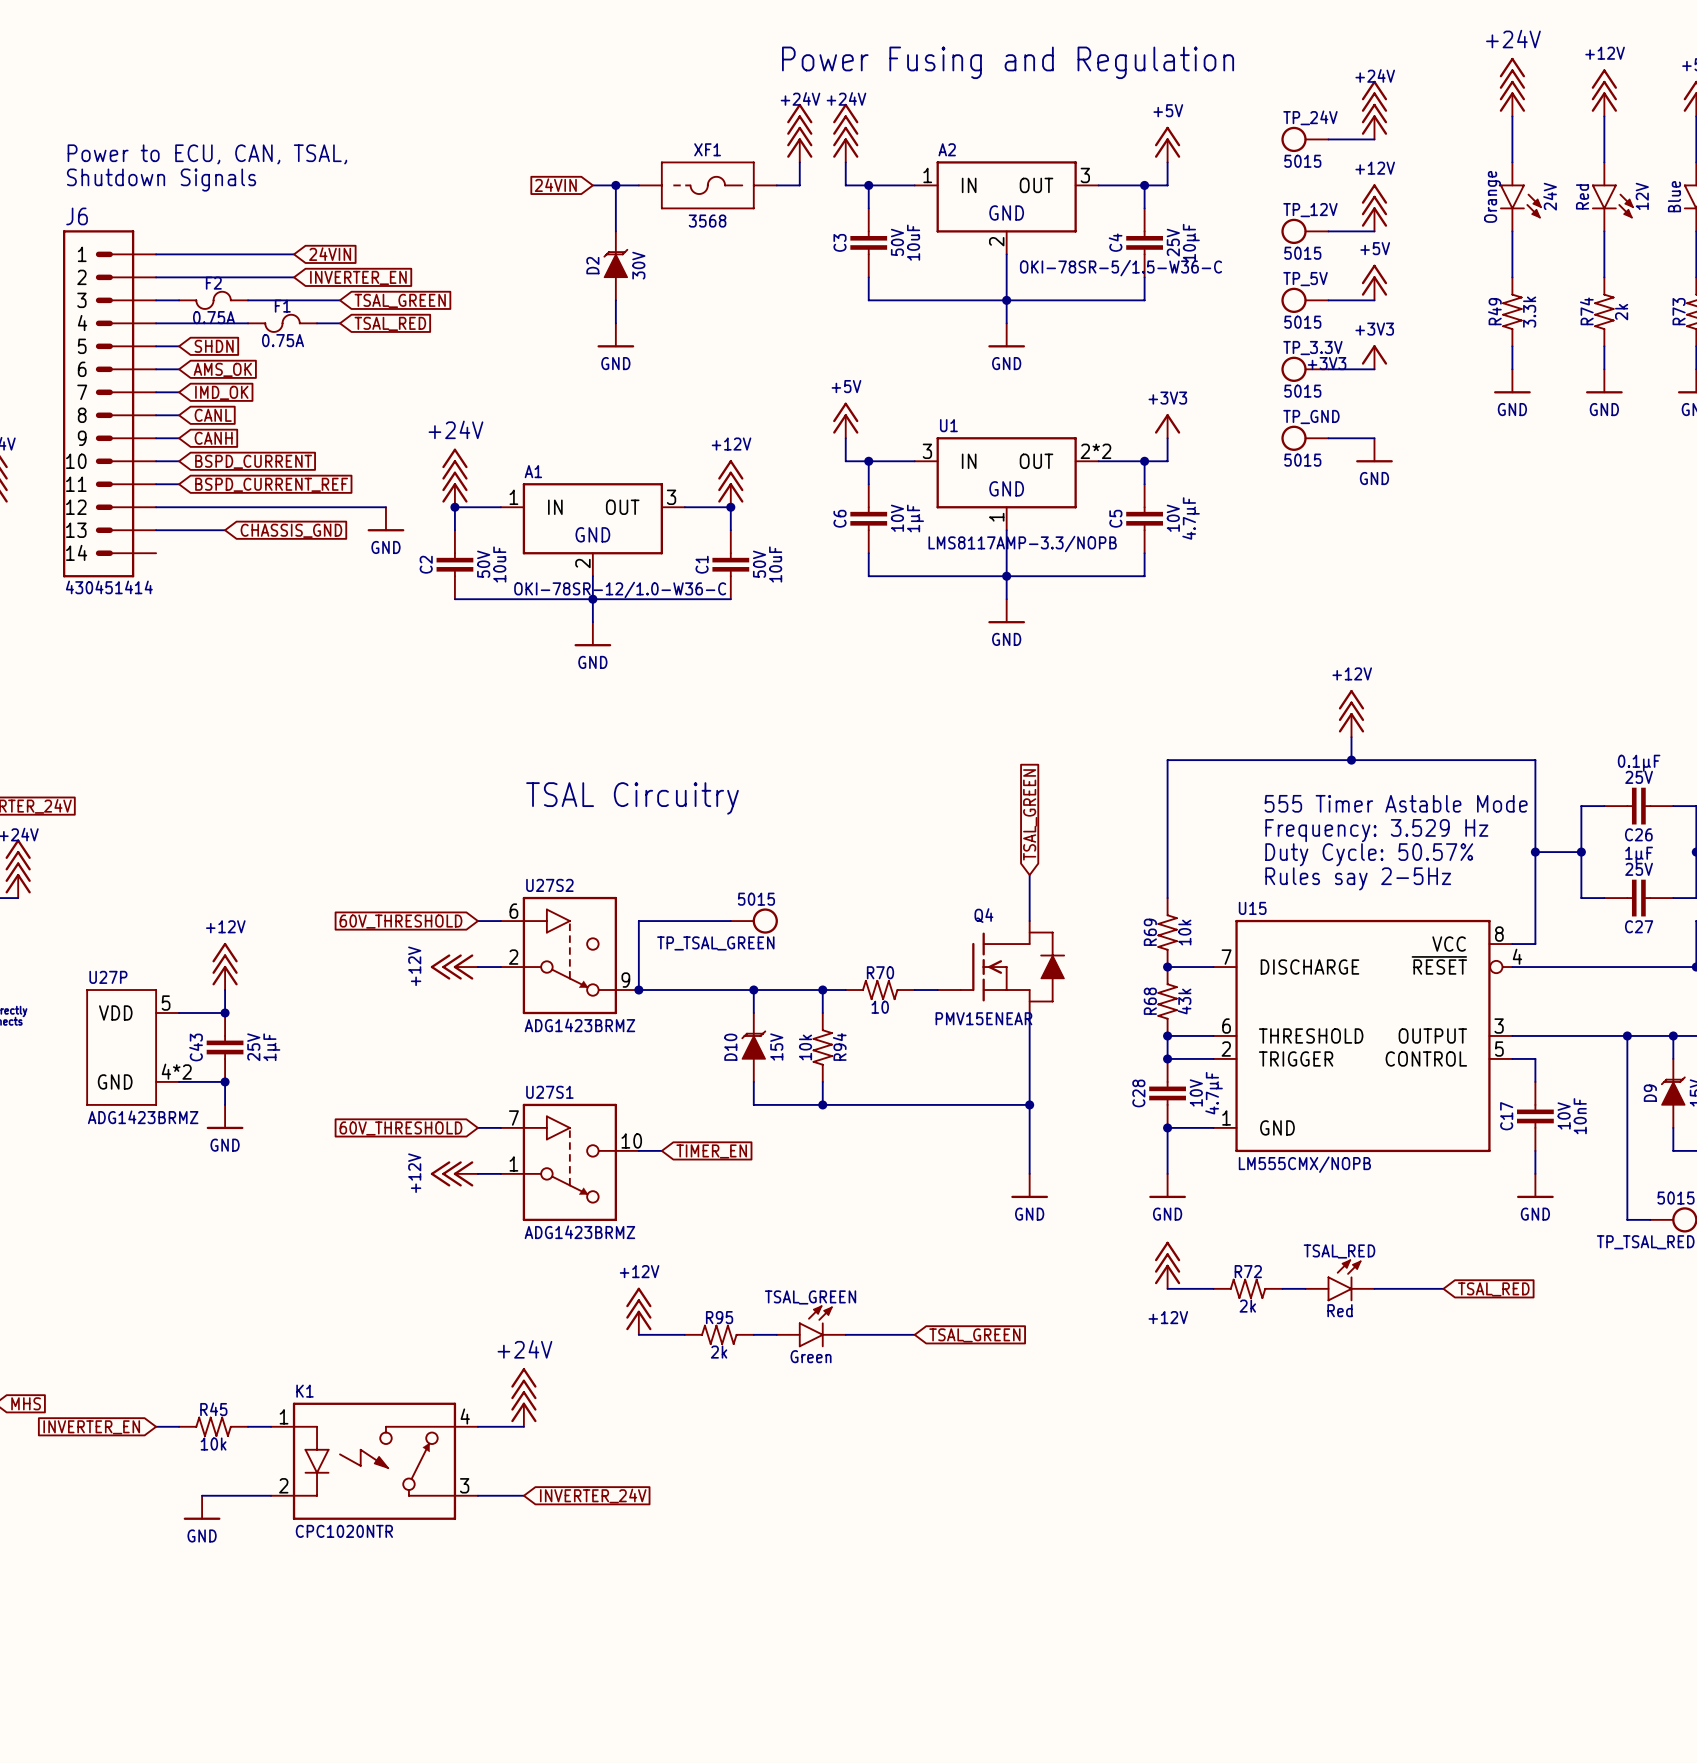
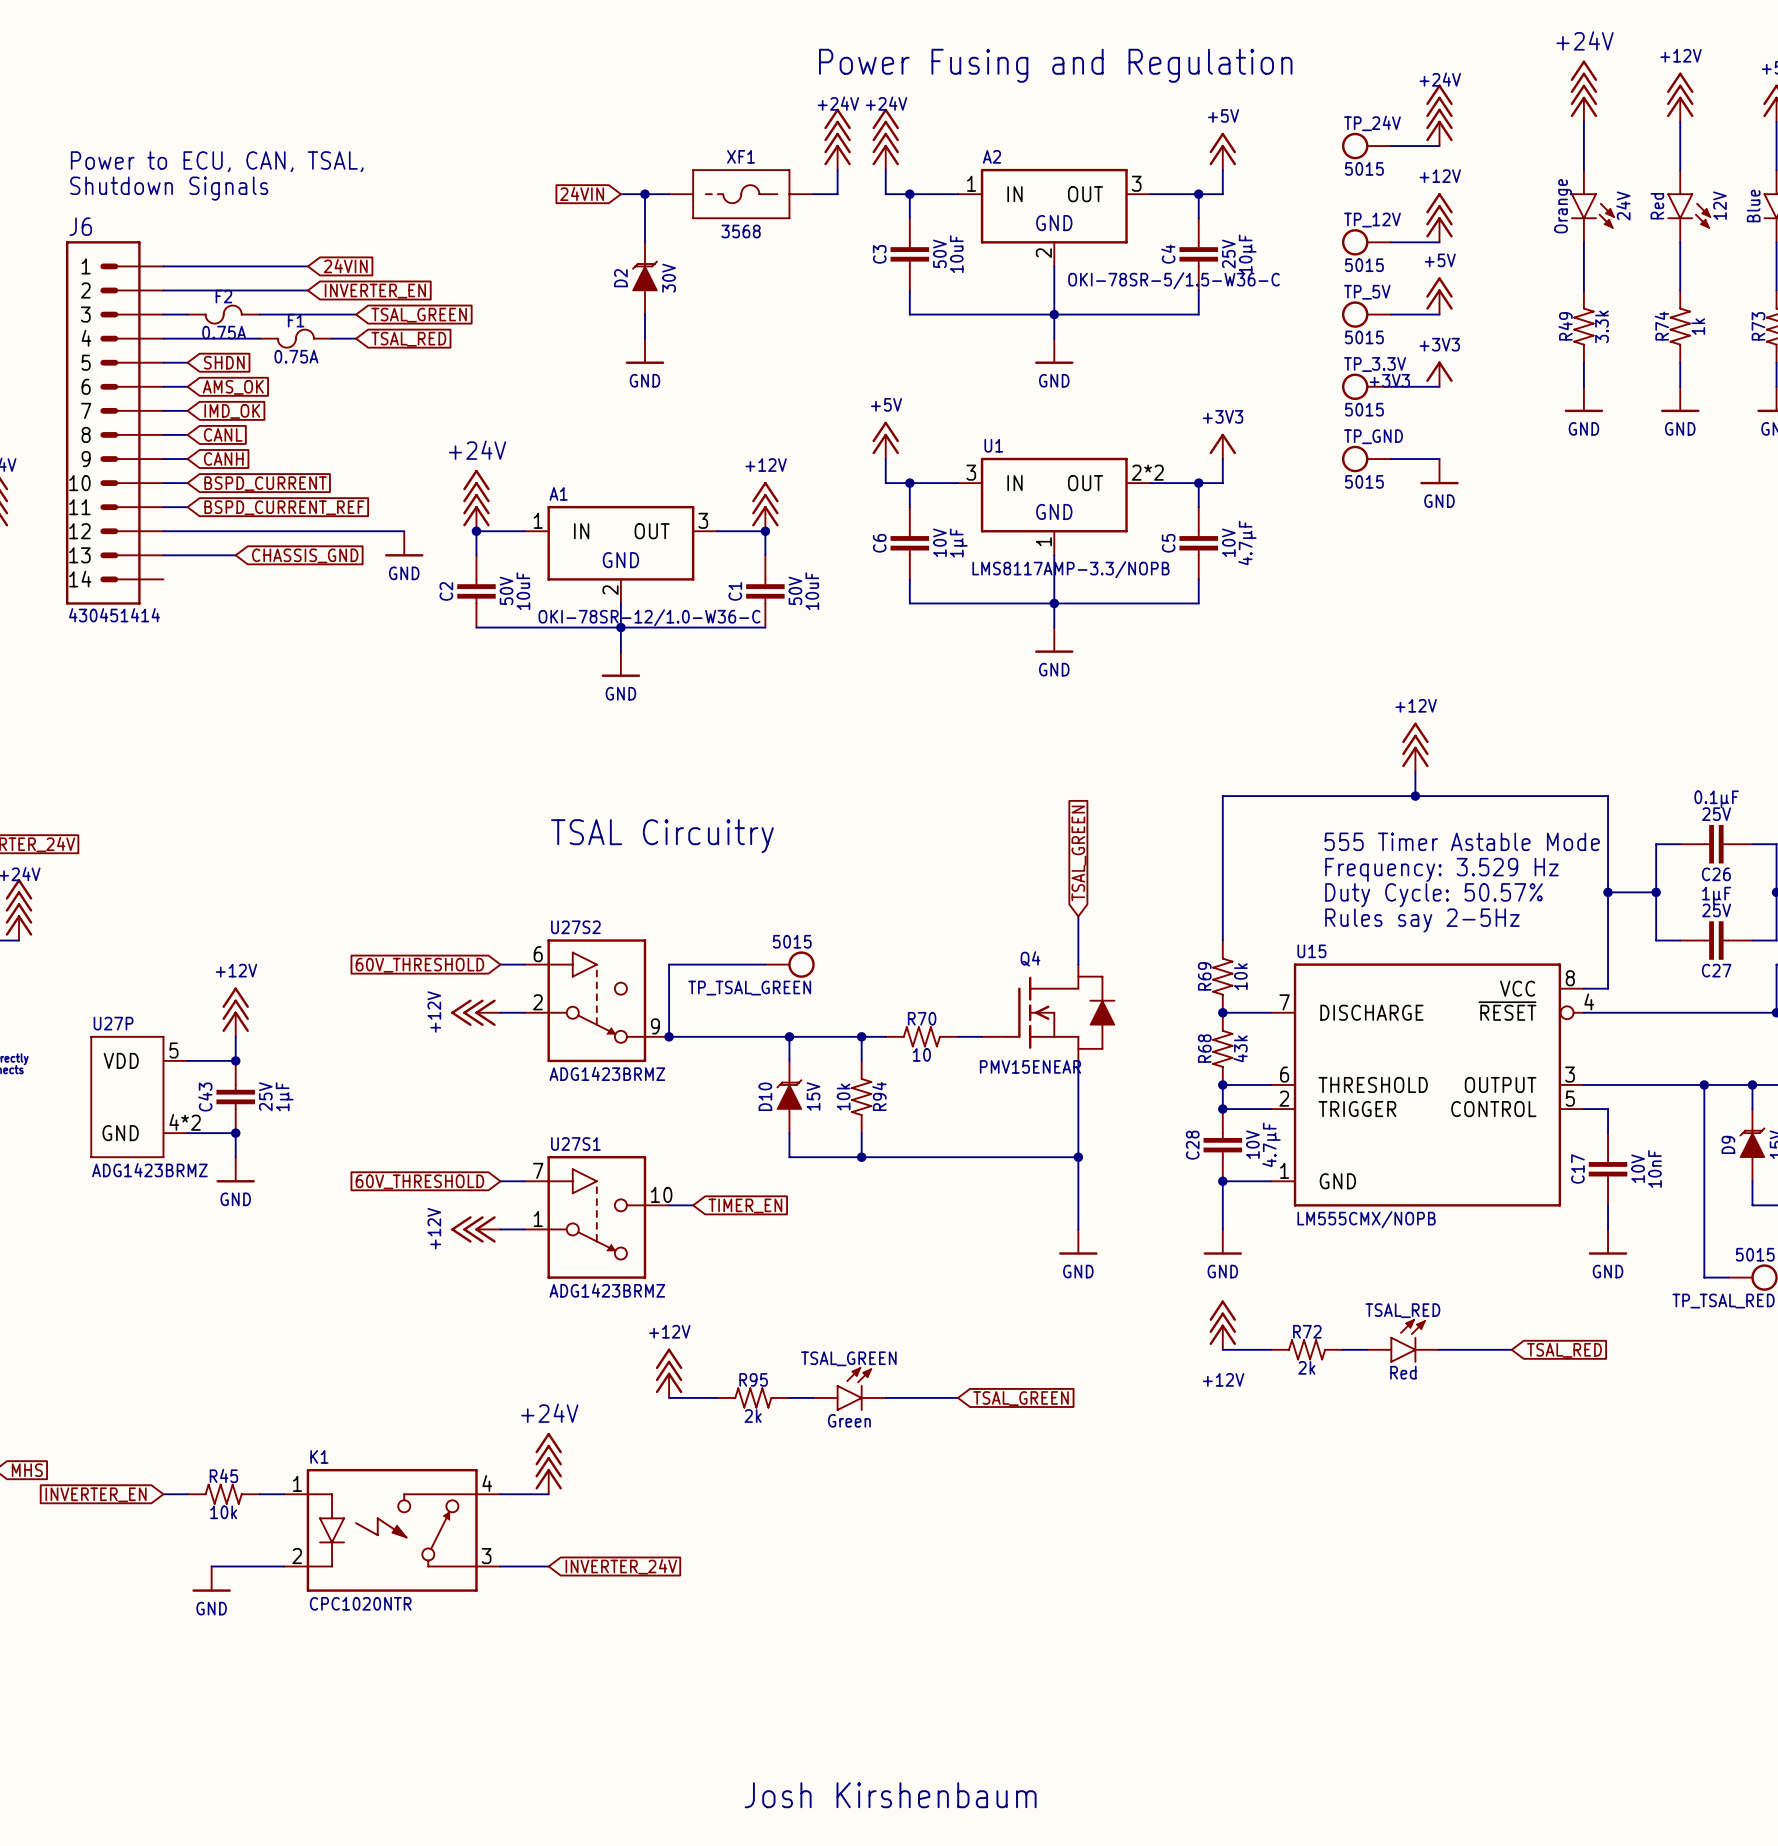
R74 text: 2k (1621, 312) -> 1k (1698, 326)
text: none -> Josh Kirshenbaum (890, 1795)

